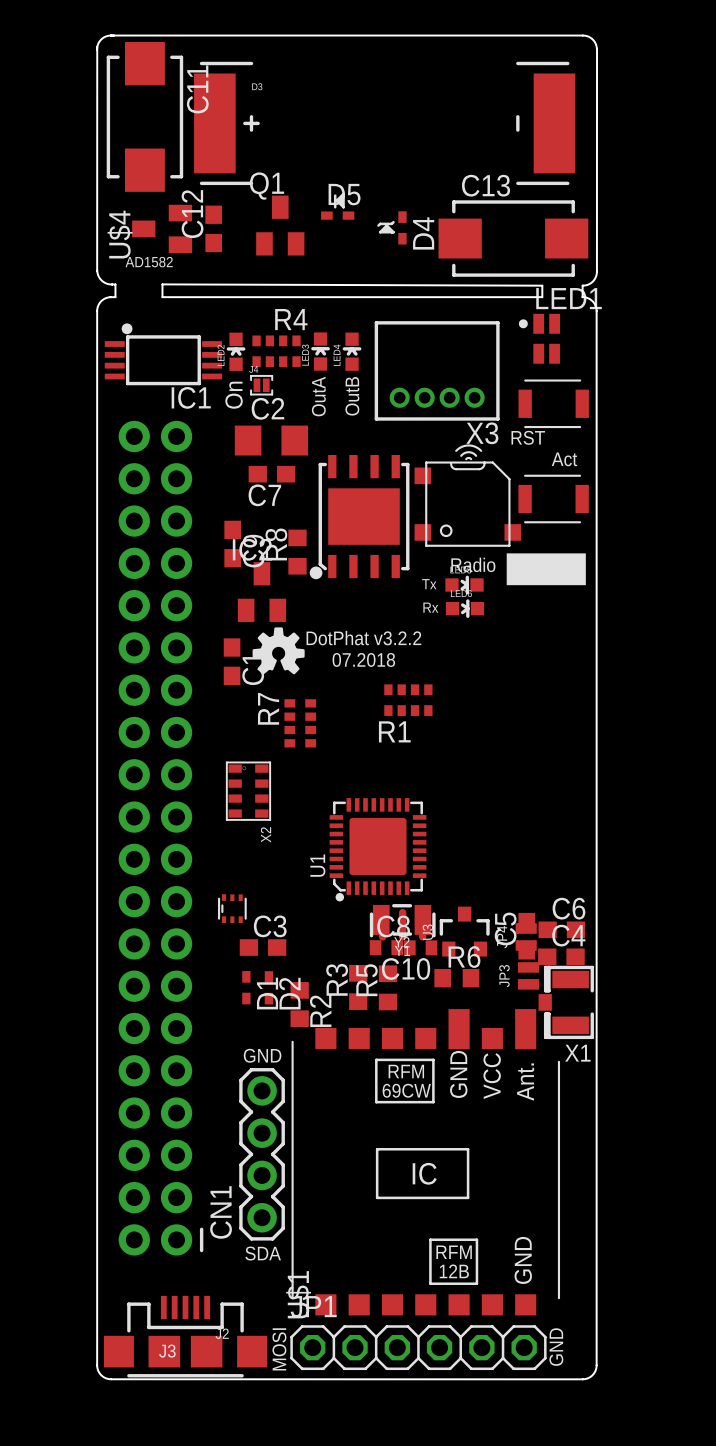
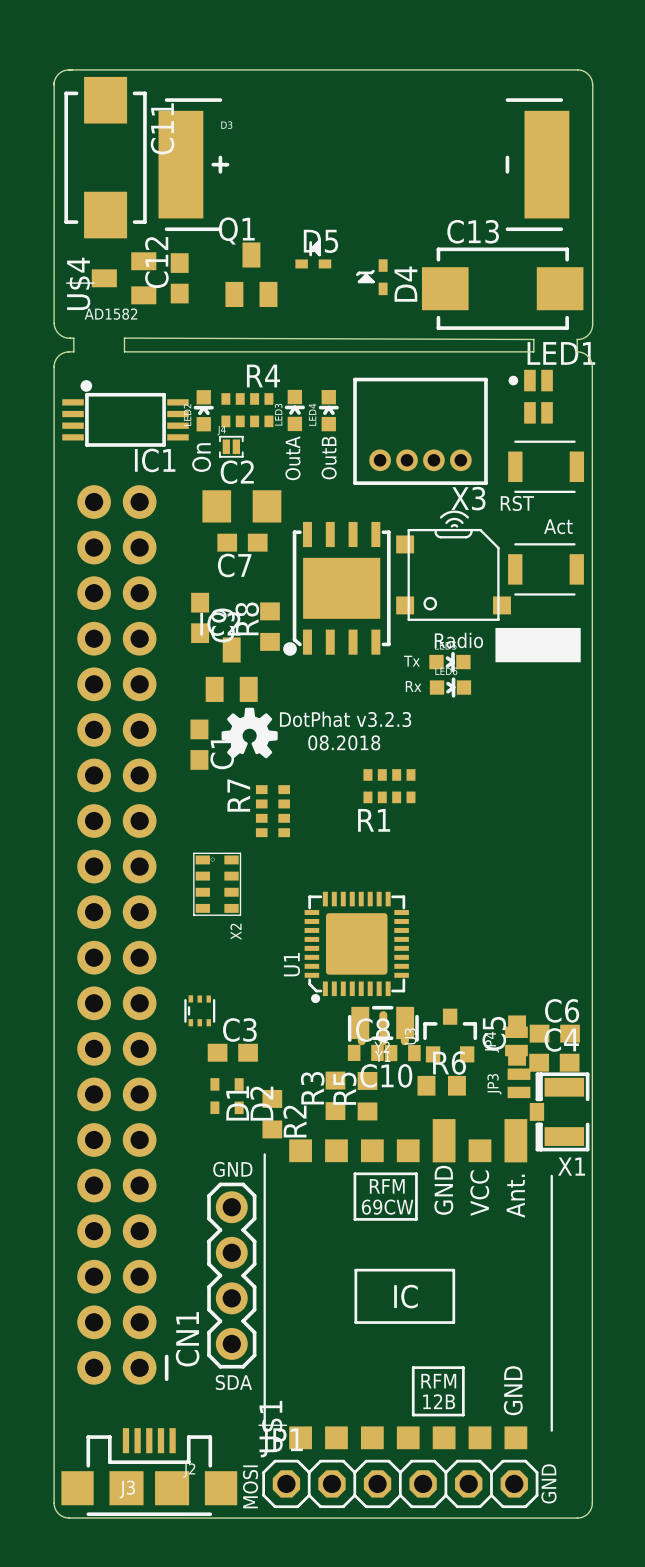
text: DotPhat v3.2.2 (363, 638) -> DotPhat v3.2.3 (345, 719)
text: 07.2018 (363, 659) -> 08.2018 (344, 742)

